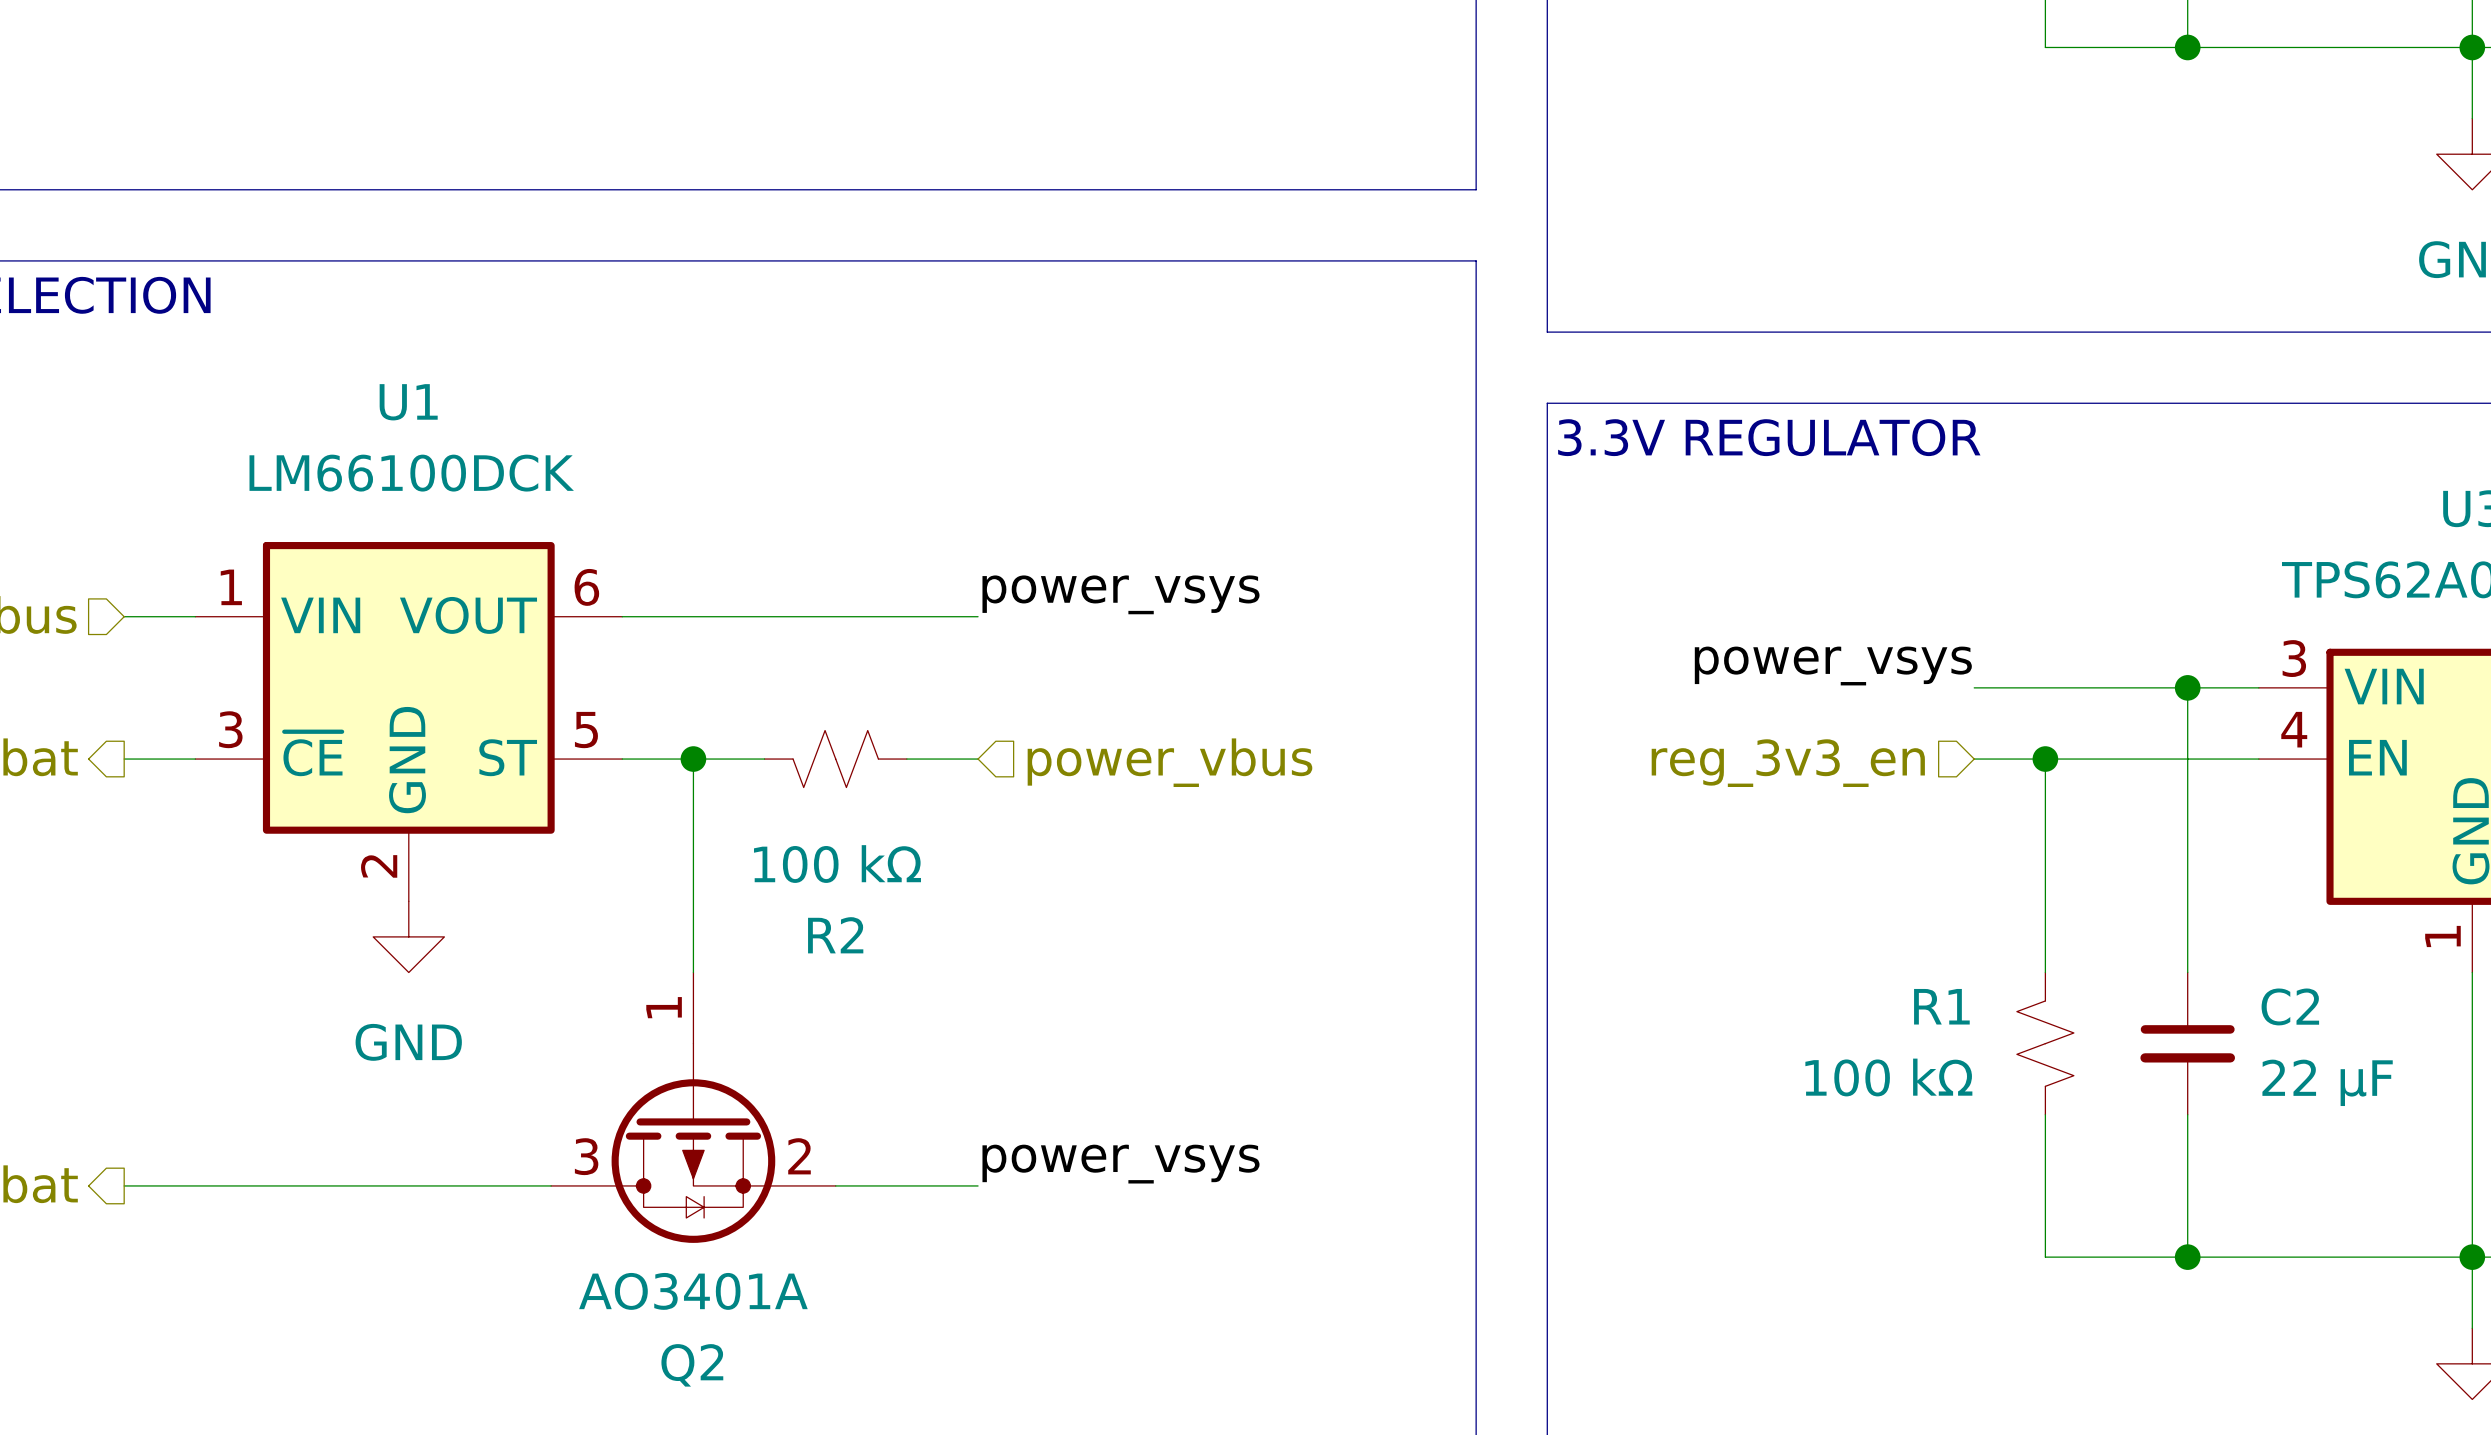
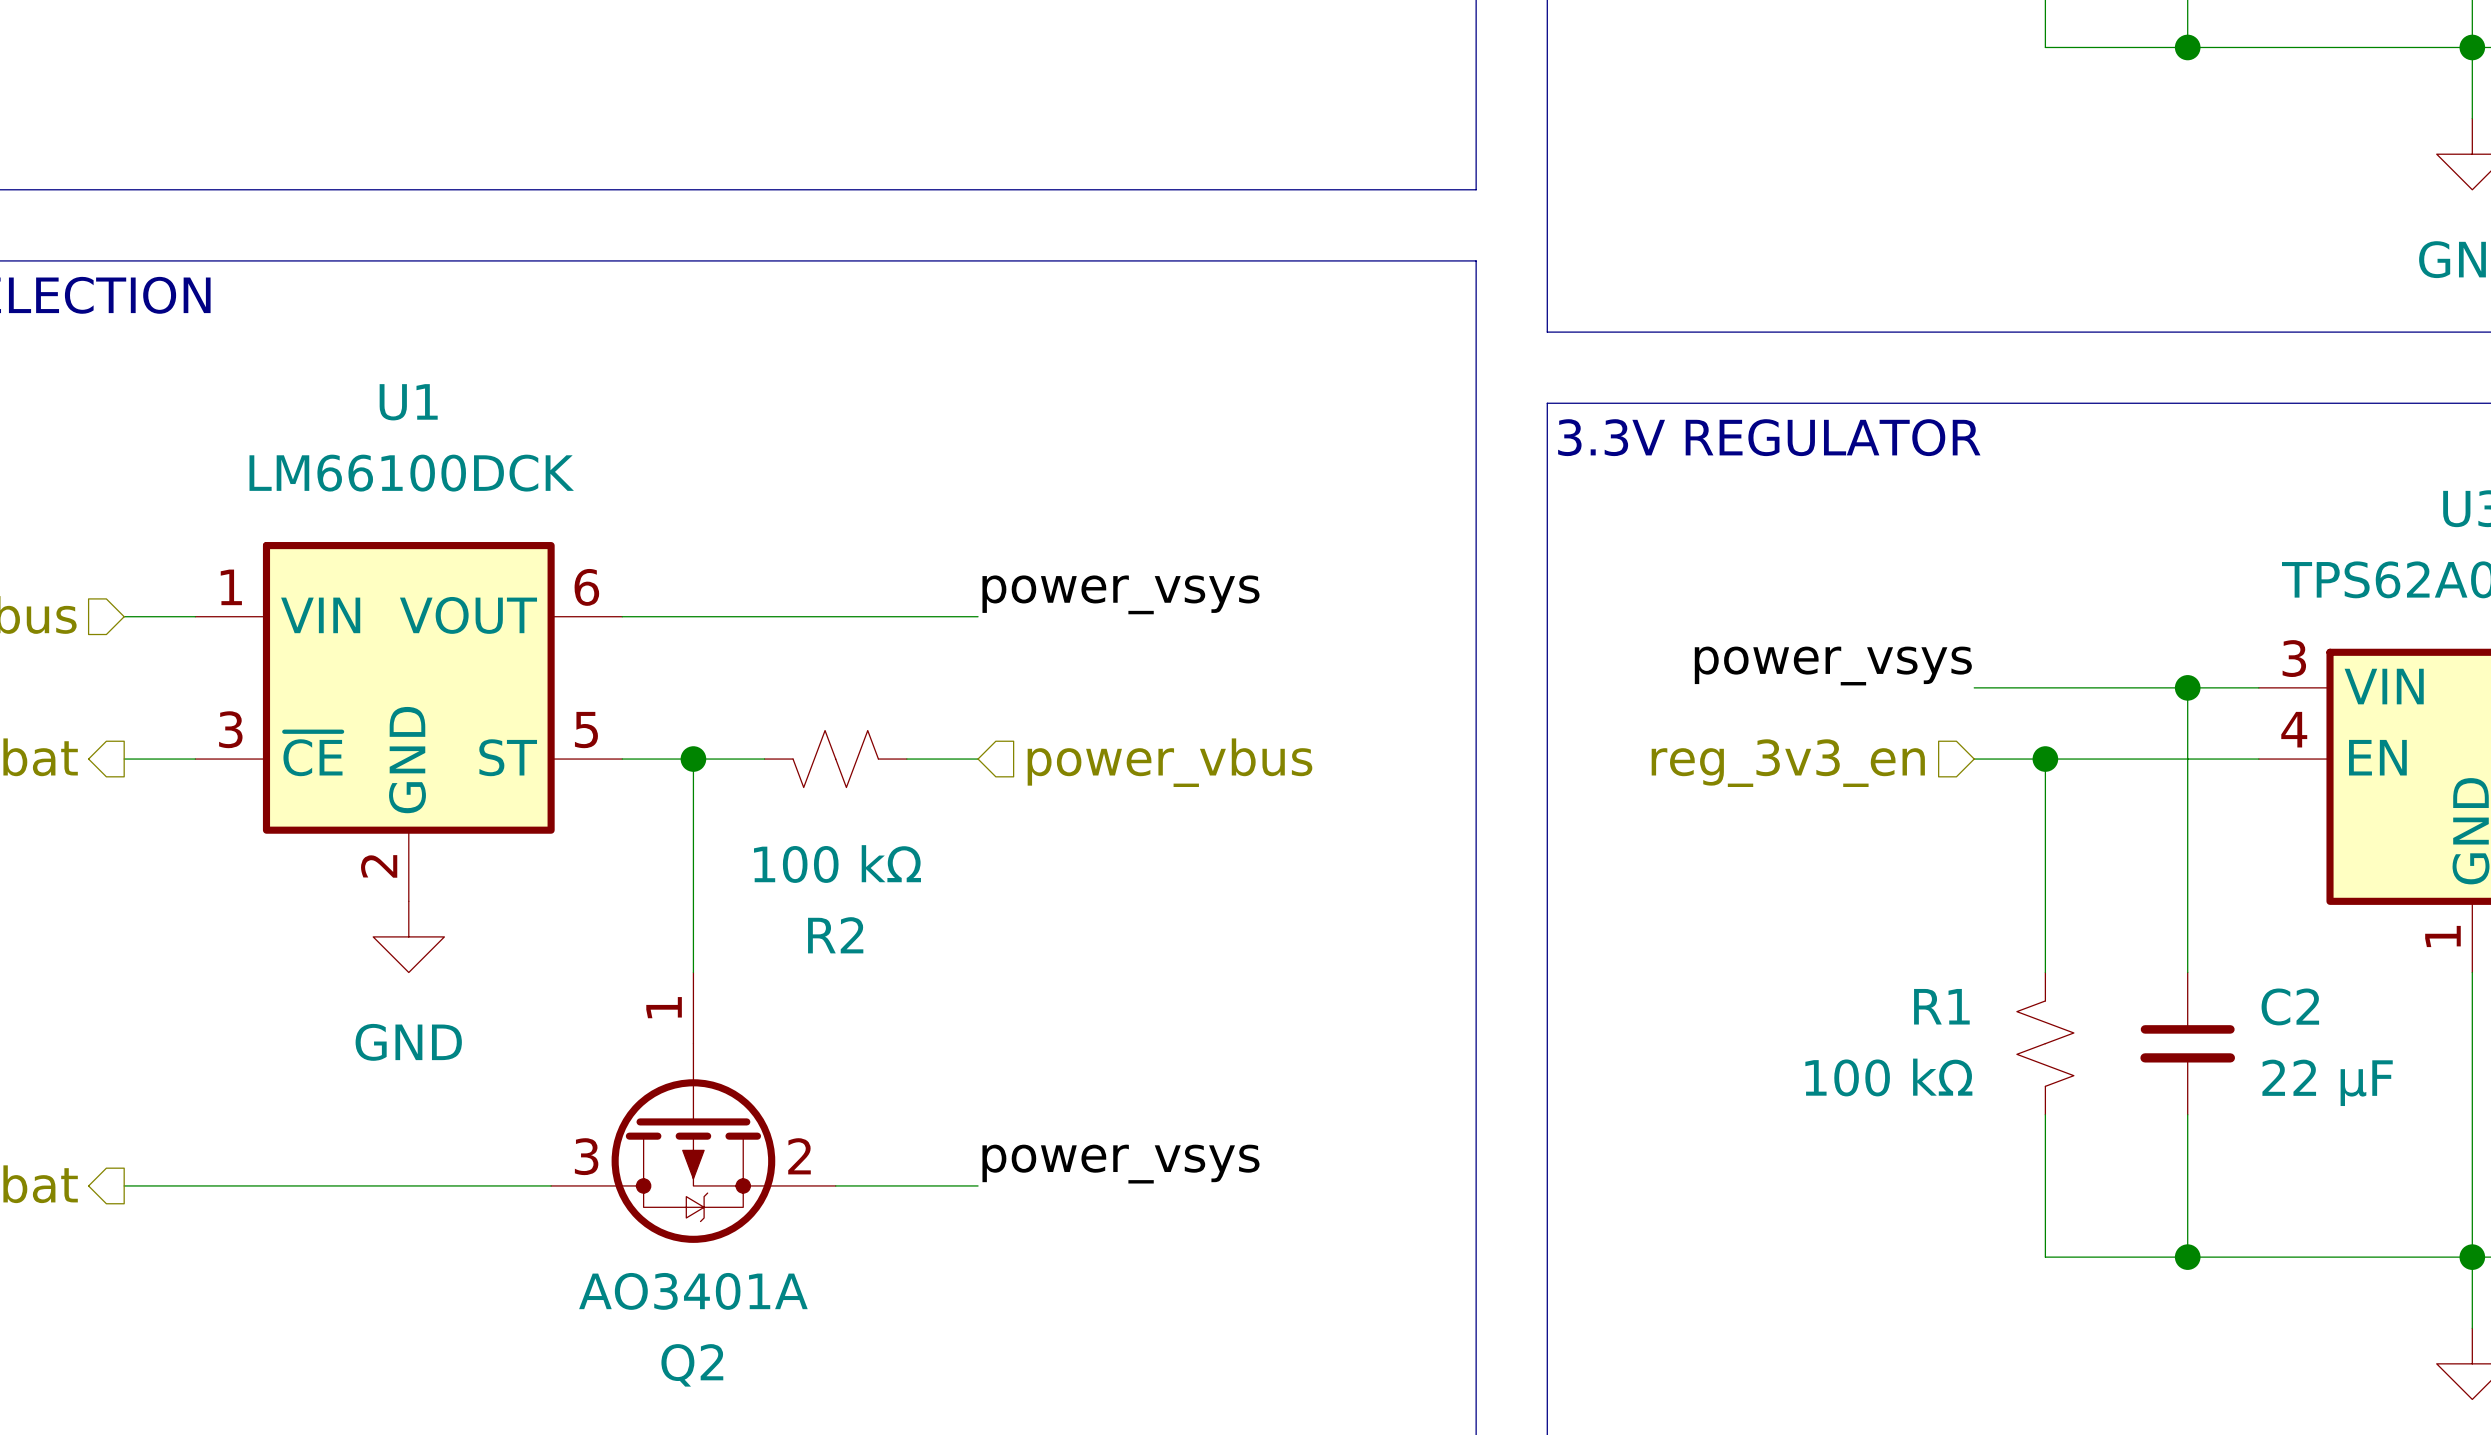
Q2 symbol: [551, 972, 836, 1243] -> [551, 972, 836, 1243]

